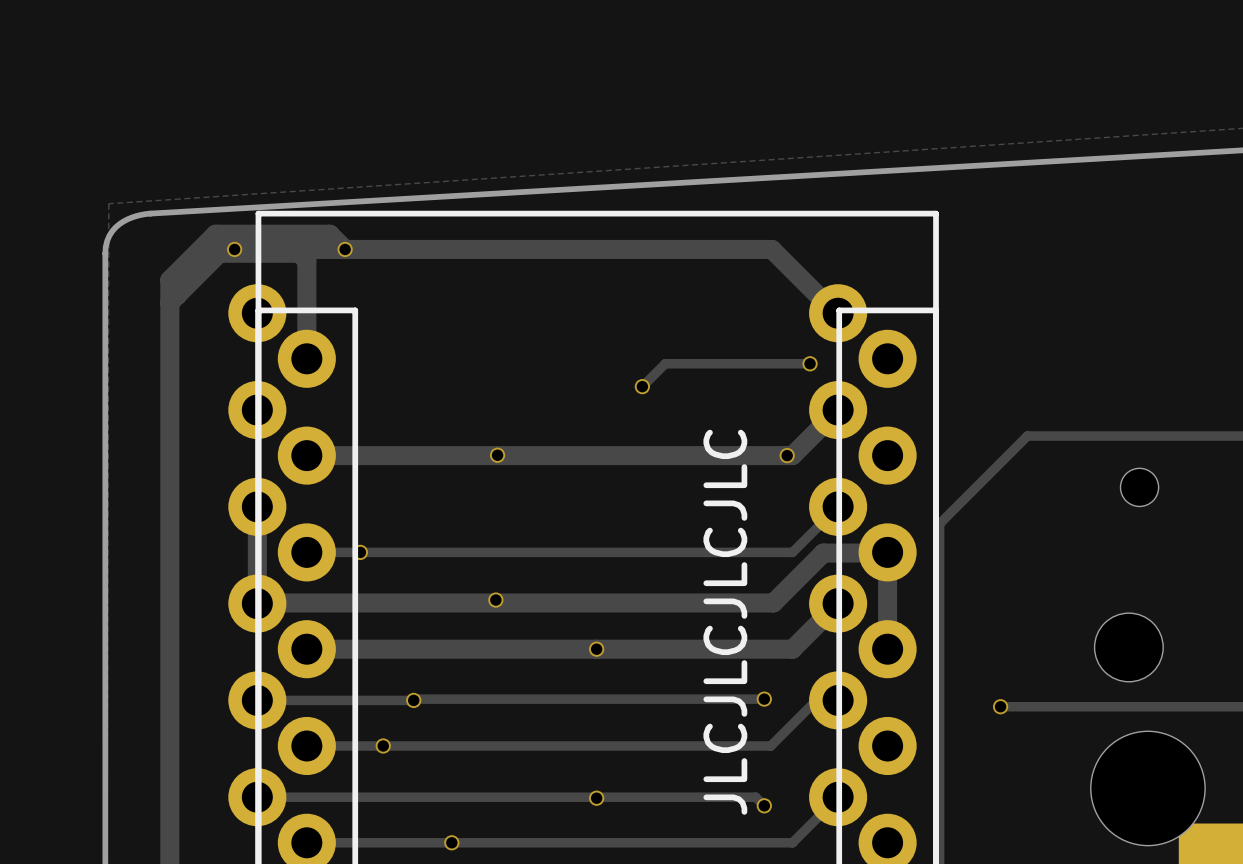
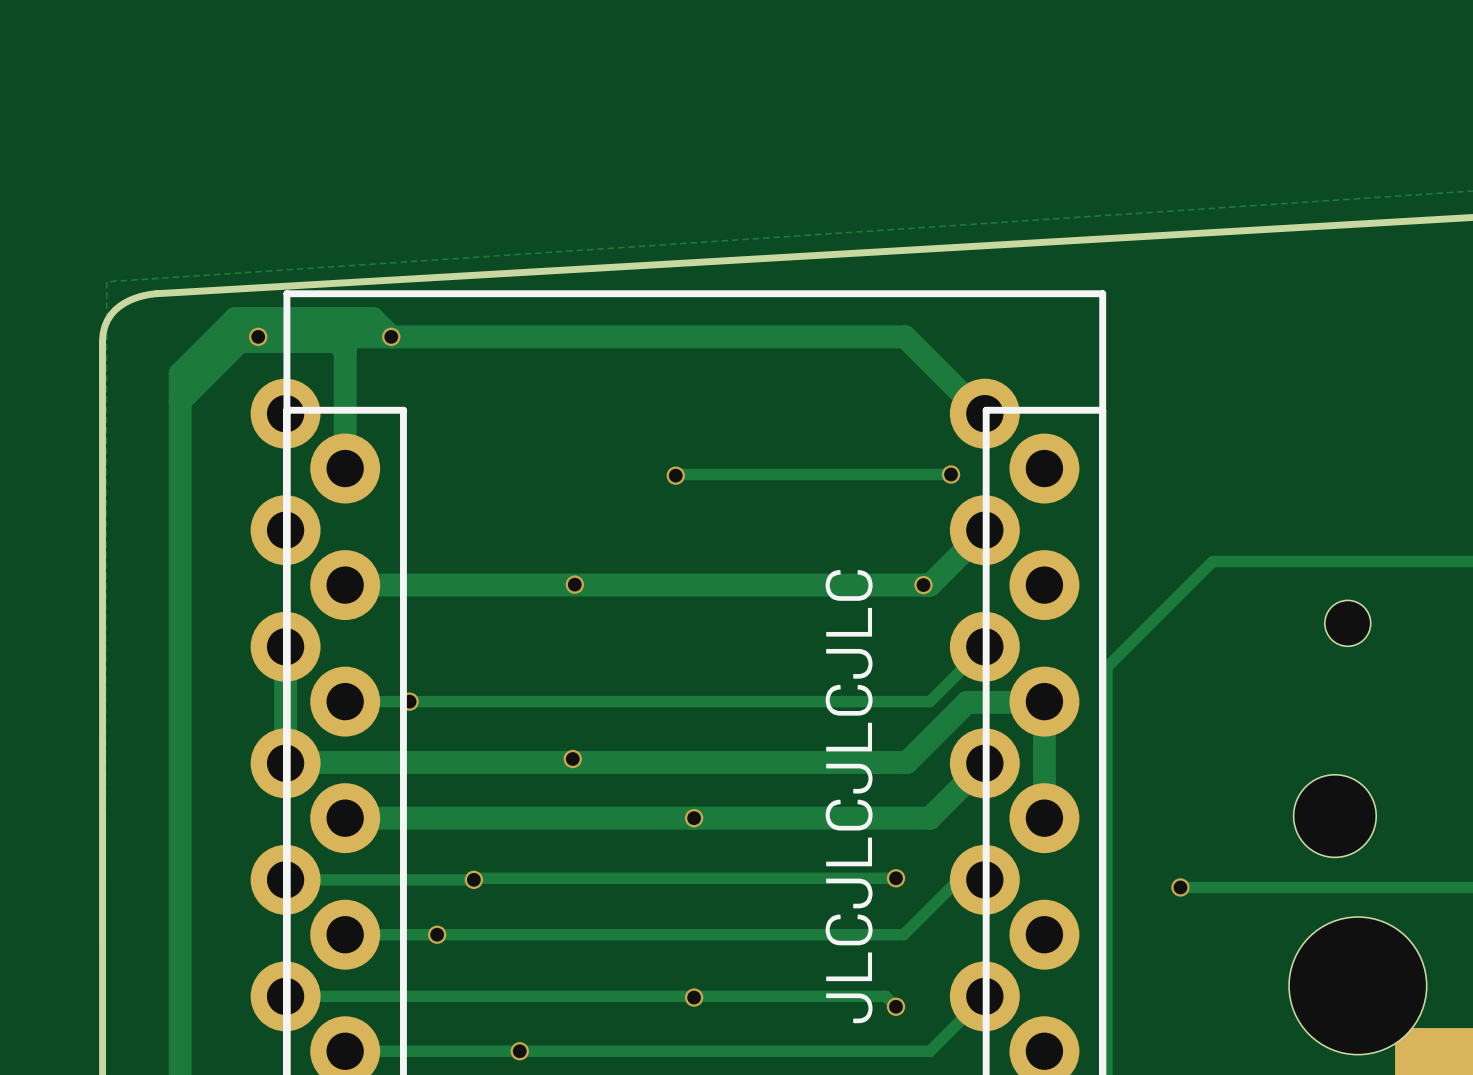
track: (665, 363) (642, 386) -> (776, 474) (675, 475)
via position: (642, 386) -> (675, 475)

